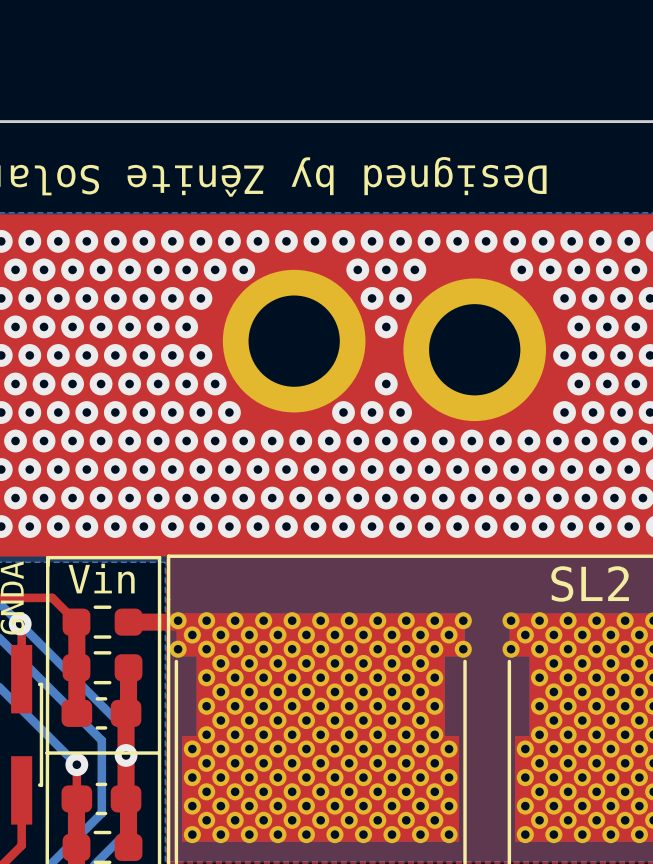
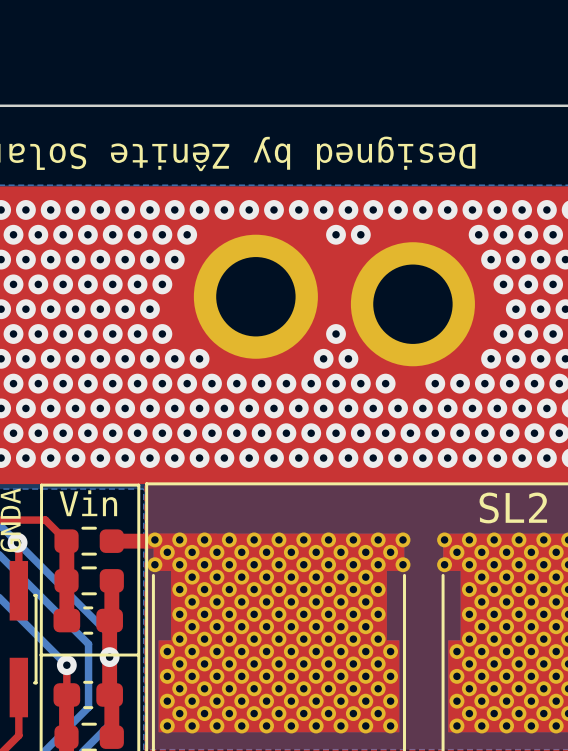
via: (243, 269) -> none
via: (357, 269) -> none
via: (521, 269) -> none
via: (372, 298) -> none
via: (400, 298) -> none
via: (386, 326) -> none
via: (200, 355) -> none
via: (564, 355) -> none
via: (215, 383) -> none
via: (343, 412) -> none
via: (471, 441) -> none

